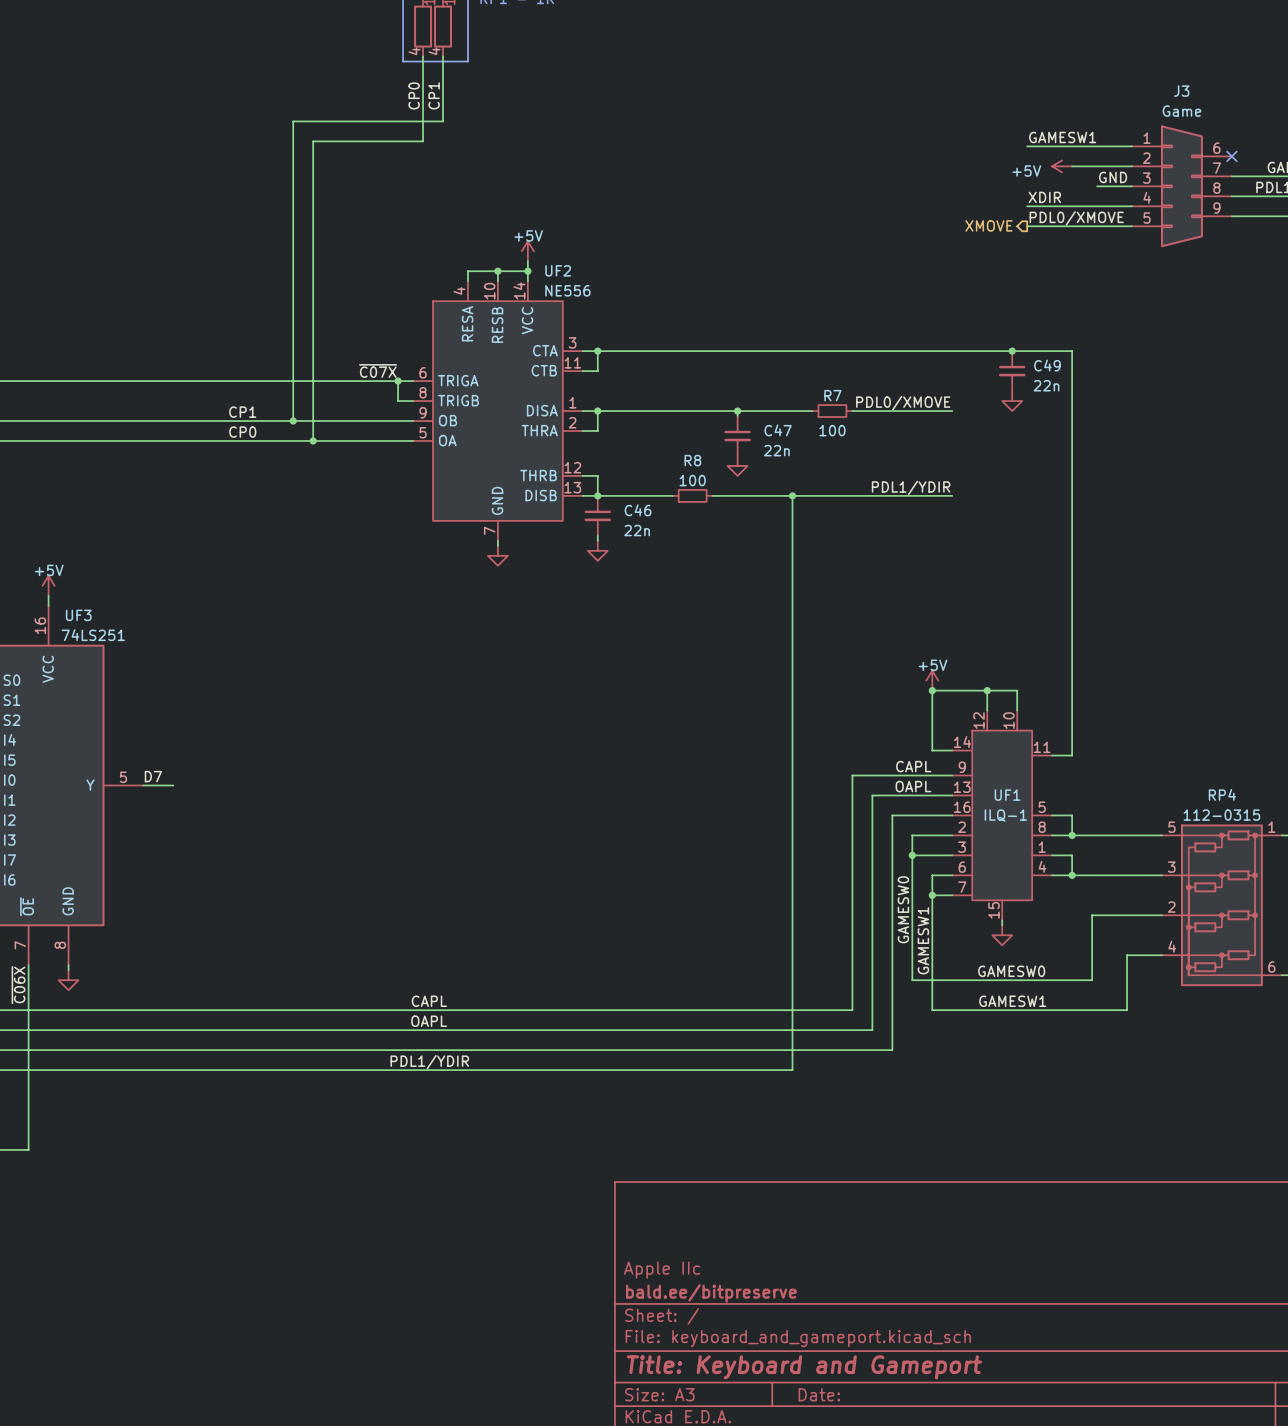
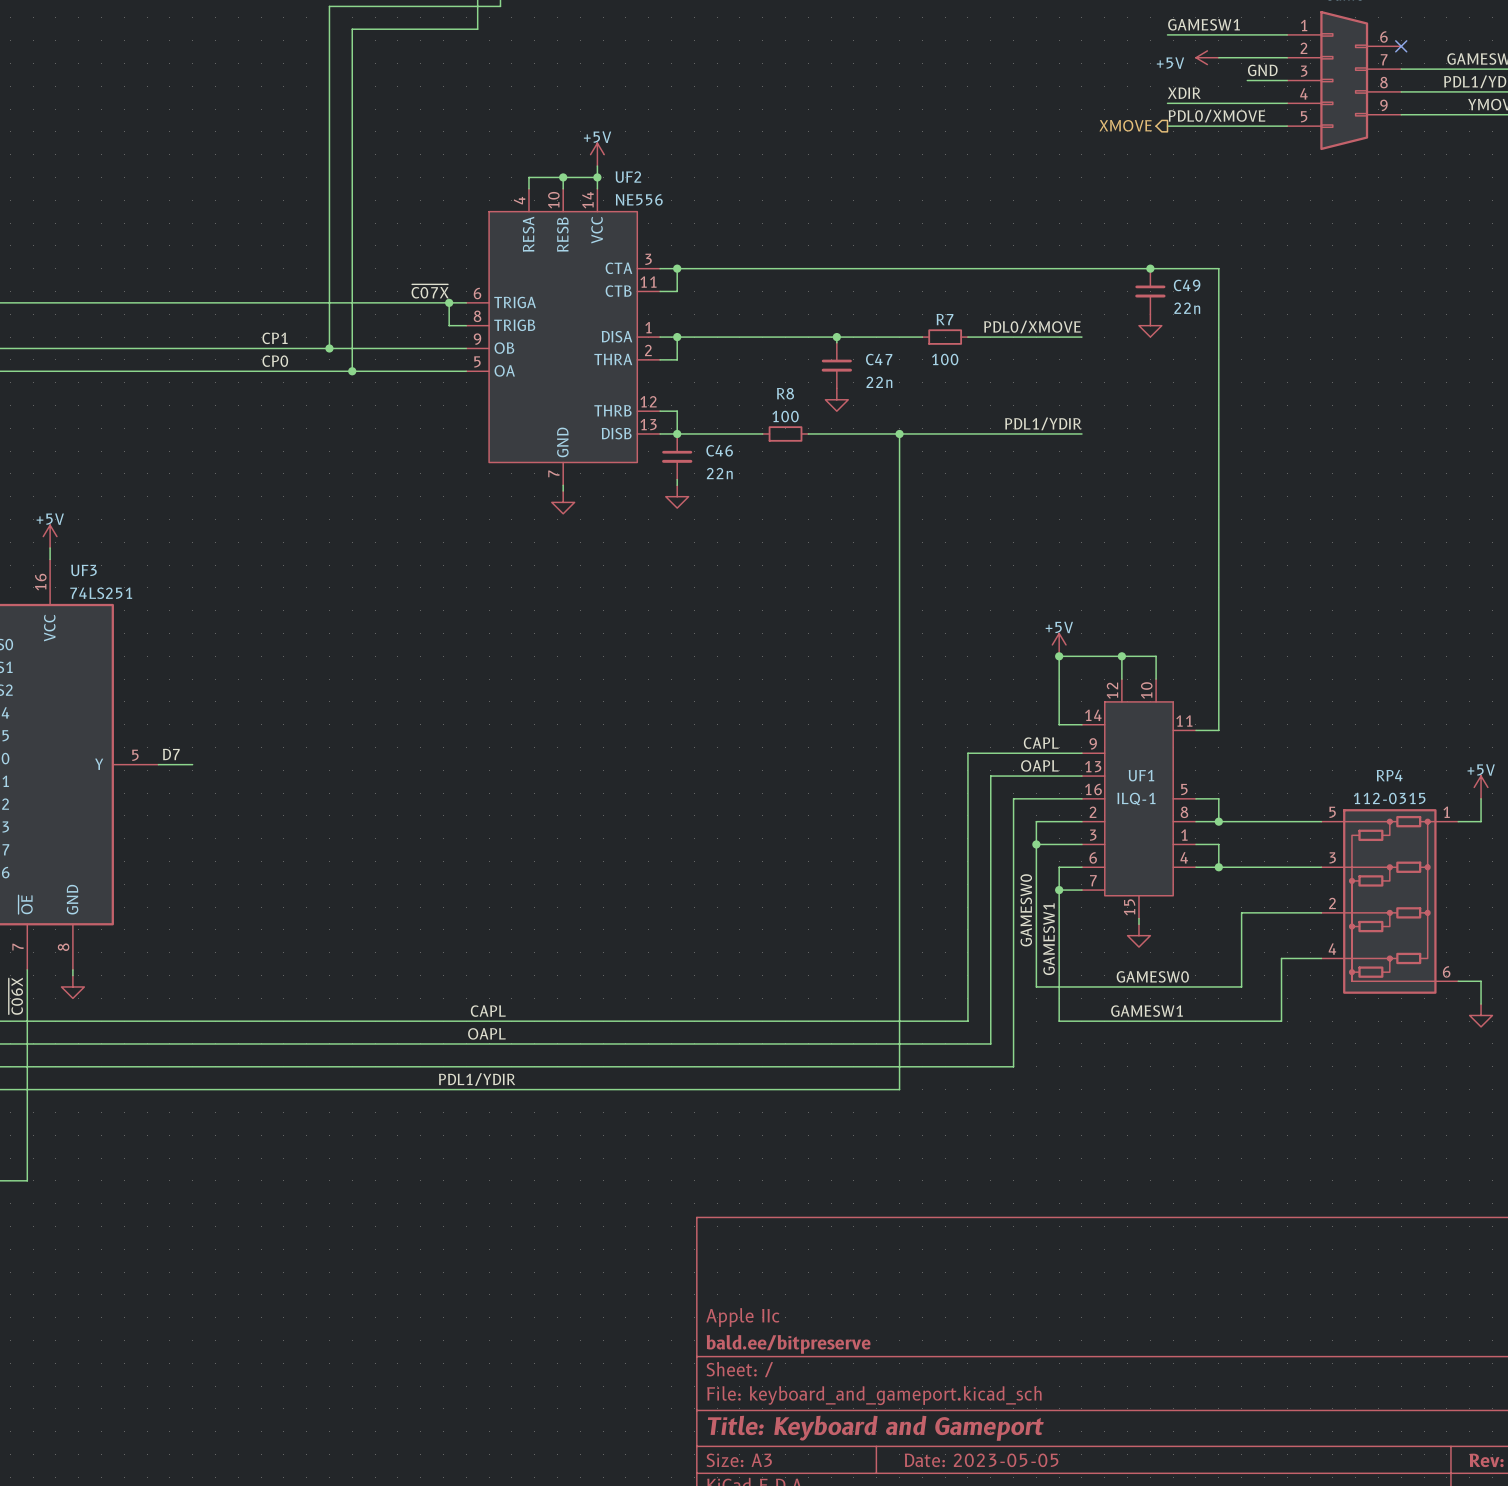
title block: Date: (819, 1394) -> Date: 2023-05-05 (981, 1460)

